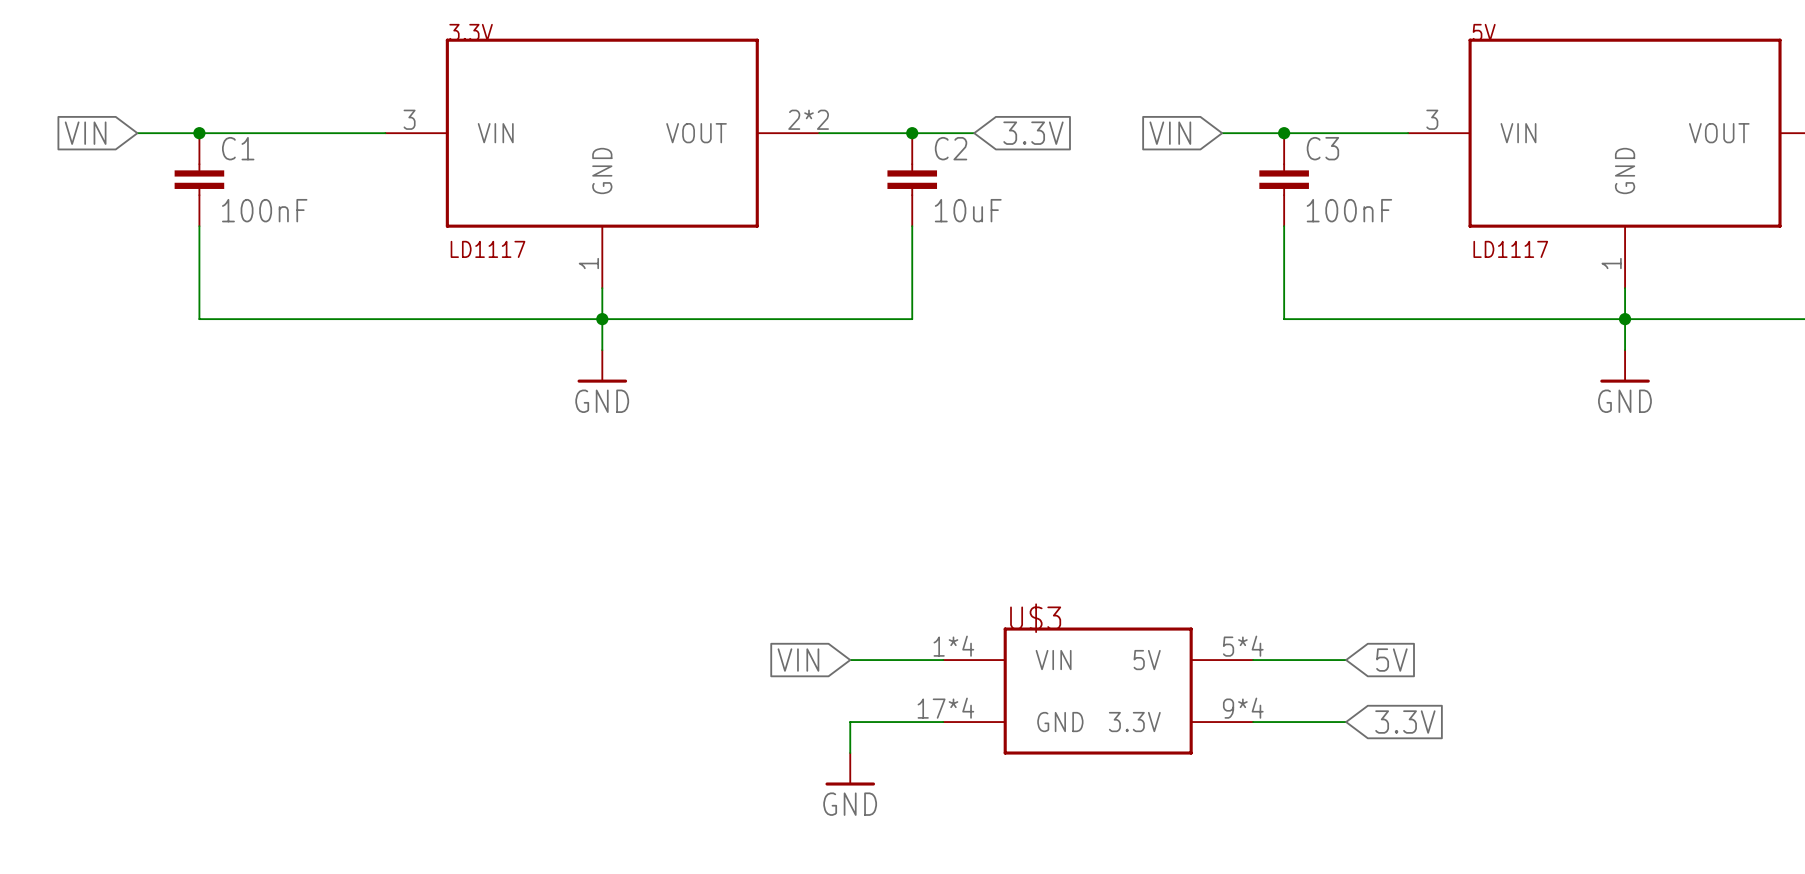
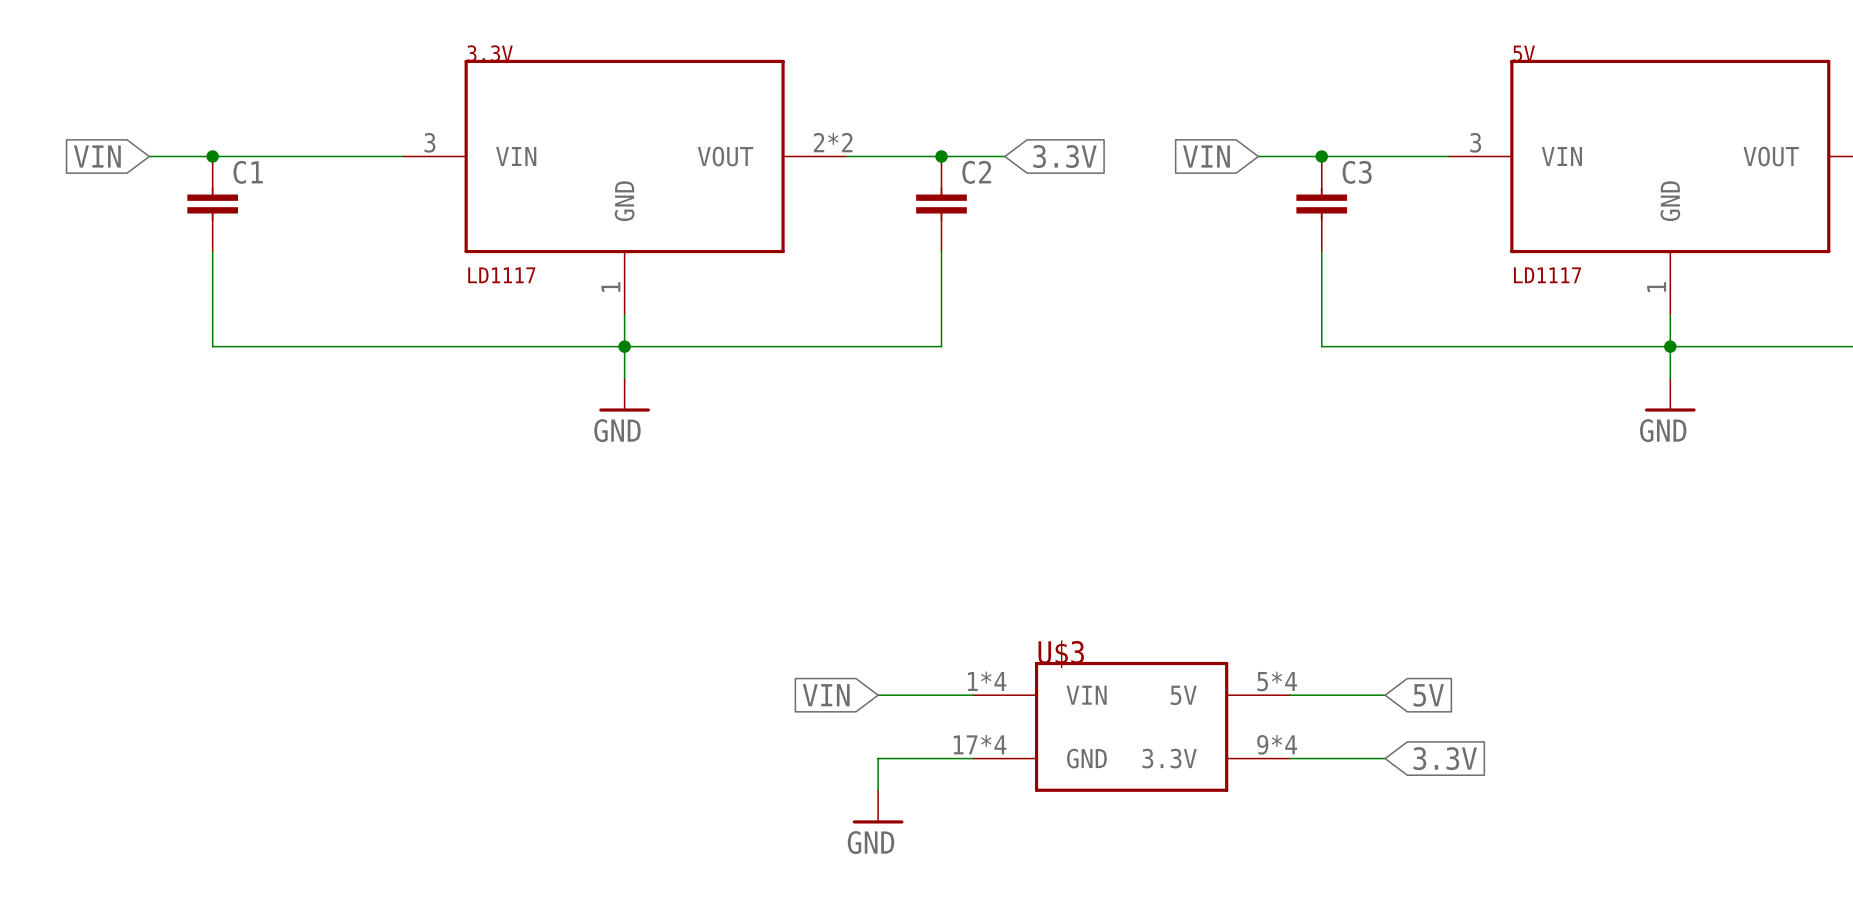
C1 value: 100nF (264, 210) -> none
C2 value: 10uF (968, 210) -> none
C3 value: 100nF (1349, 210) -> none

